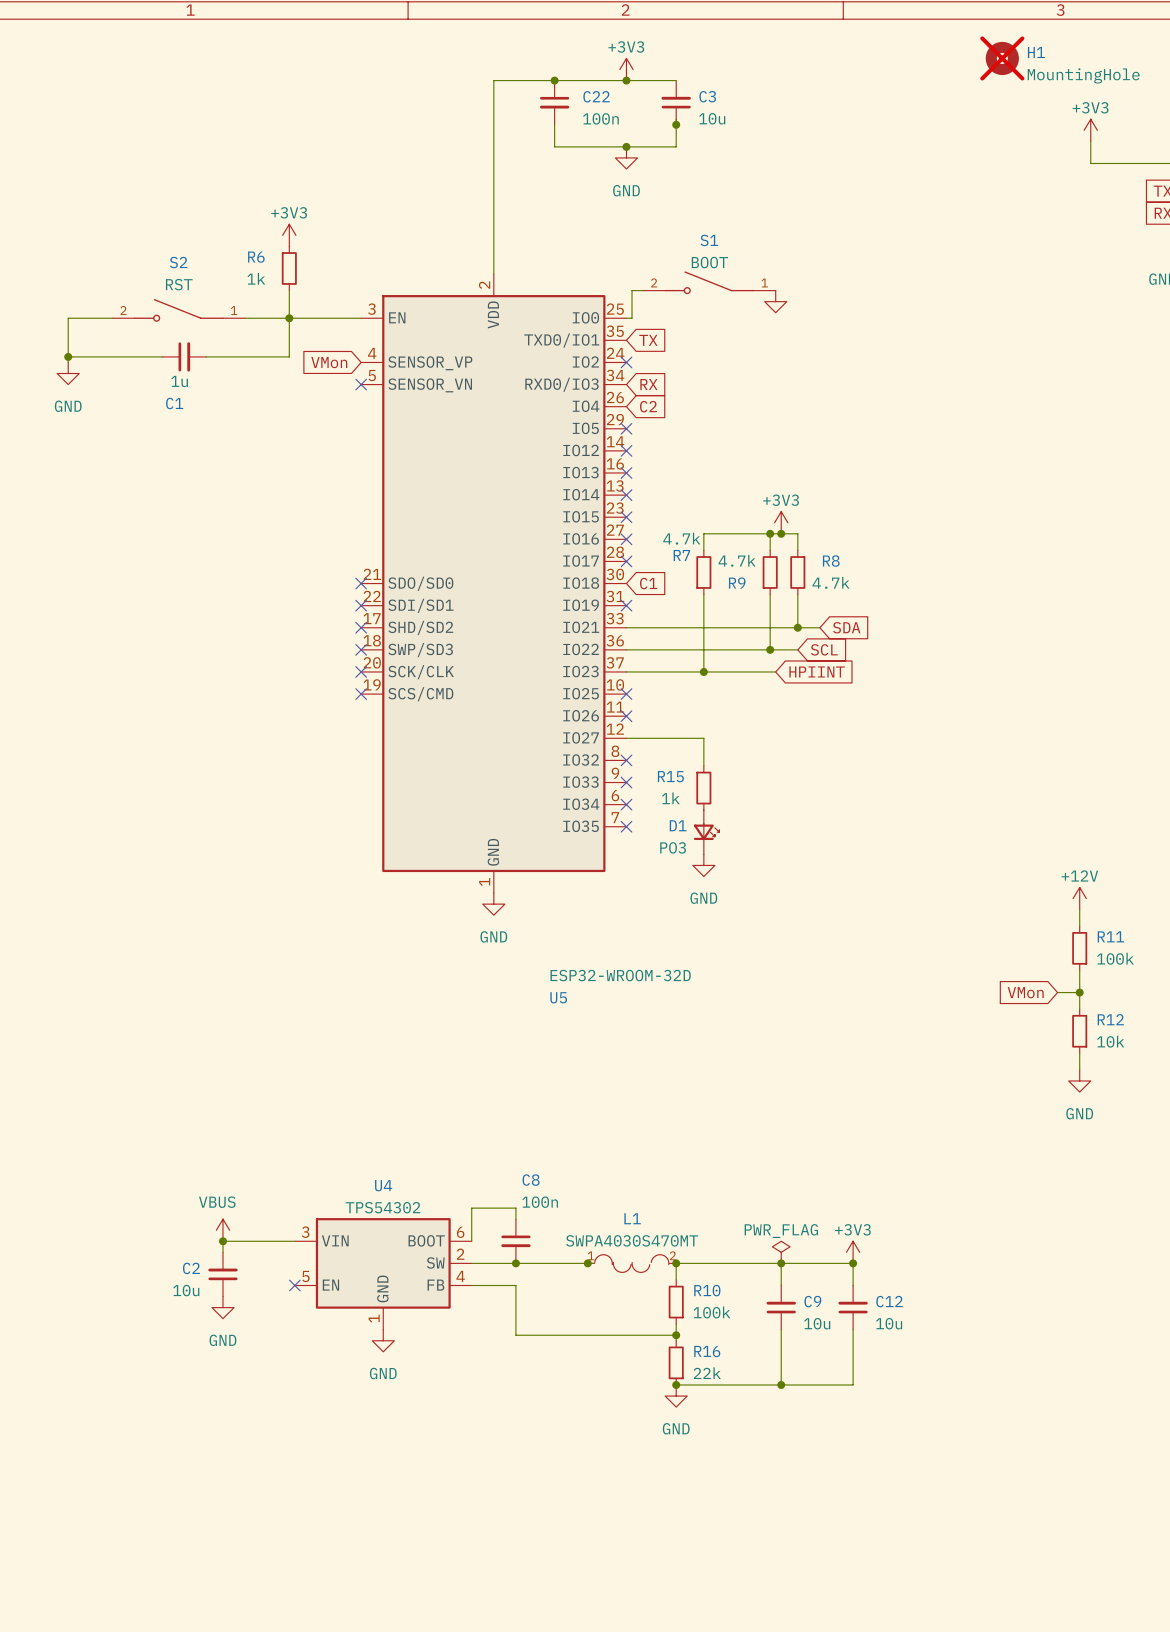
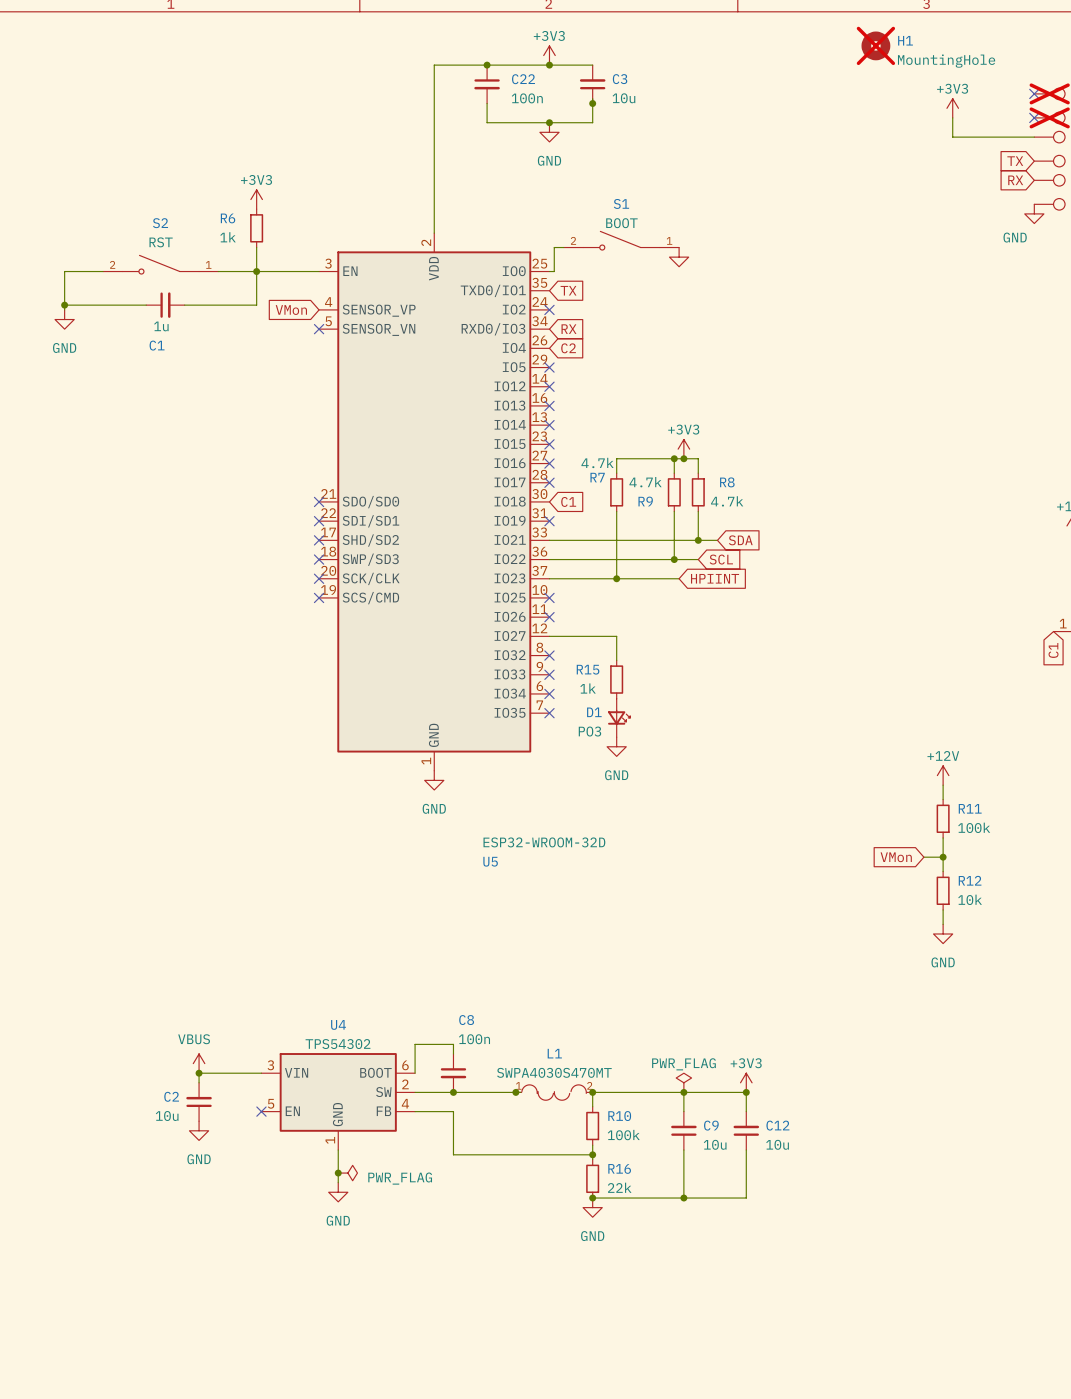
wire: none -> (338, 1150) (338, 1182)
power symbol position: GND (383, 1340) -> GND (338, 1192)
junction: none -> (338, 1173)
power symbol: none -> PWR_FLAG (347, 1173)

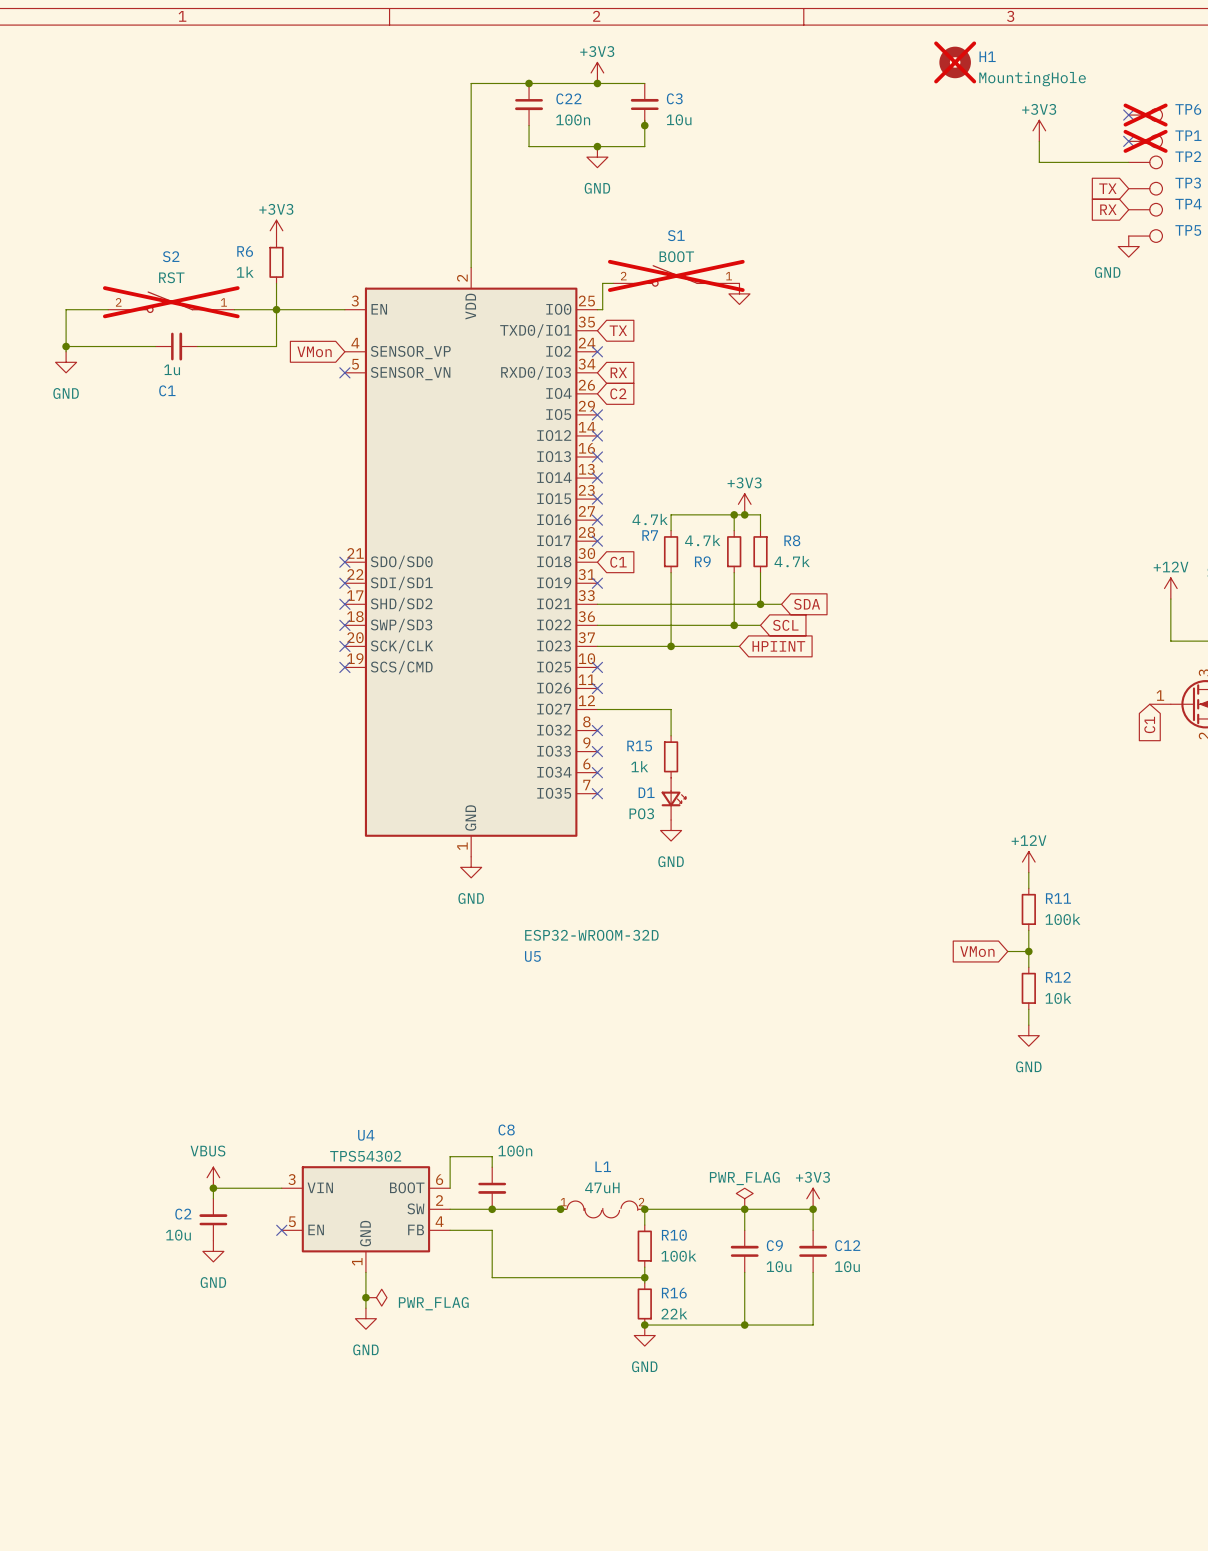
S1 do-not-place cross: none -> (676, 275)
S2 do-not-place cross: none -> (171, 302)
L1 value: SWPA4030S470MT (554, 1072) -> 47uH (602, 1187)

